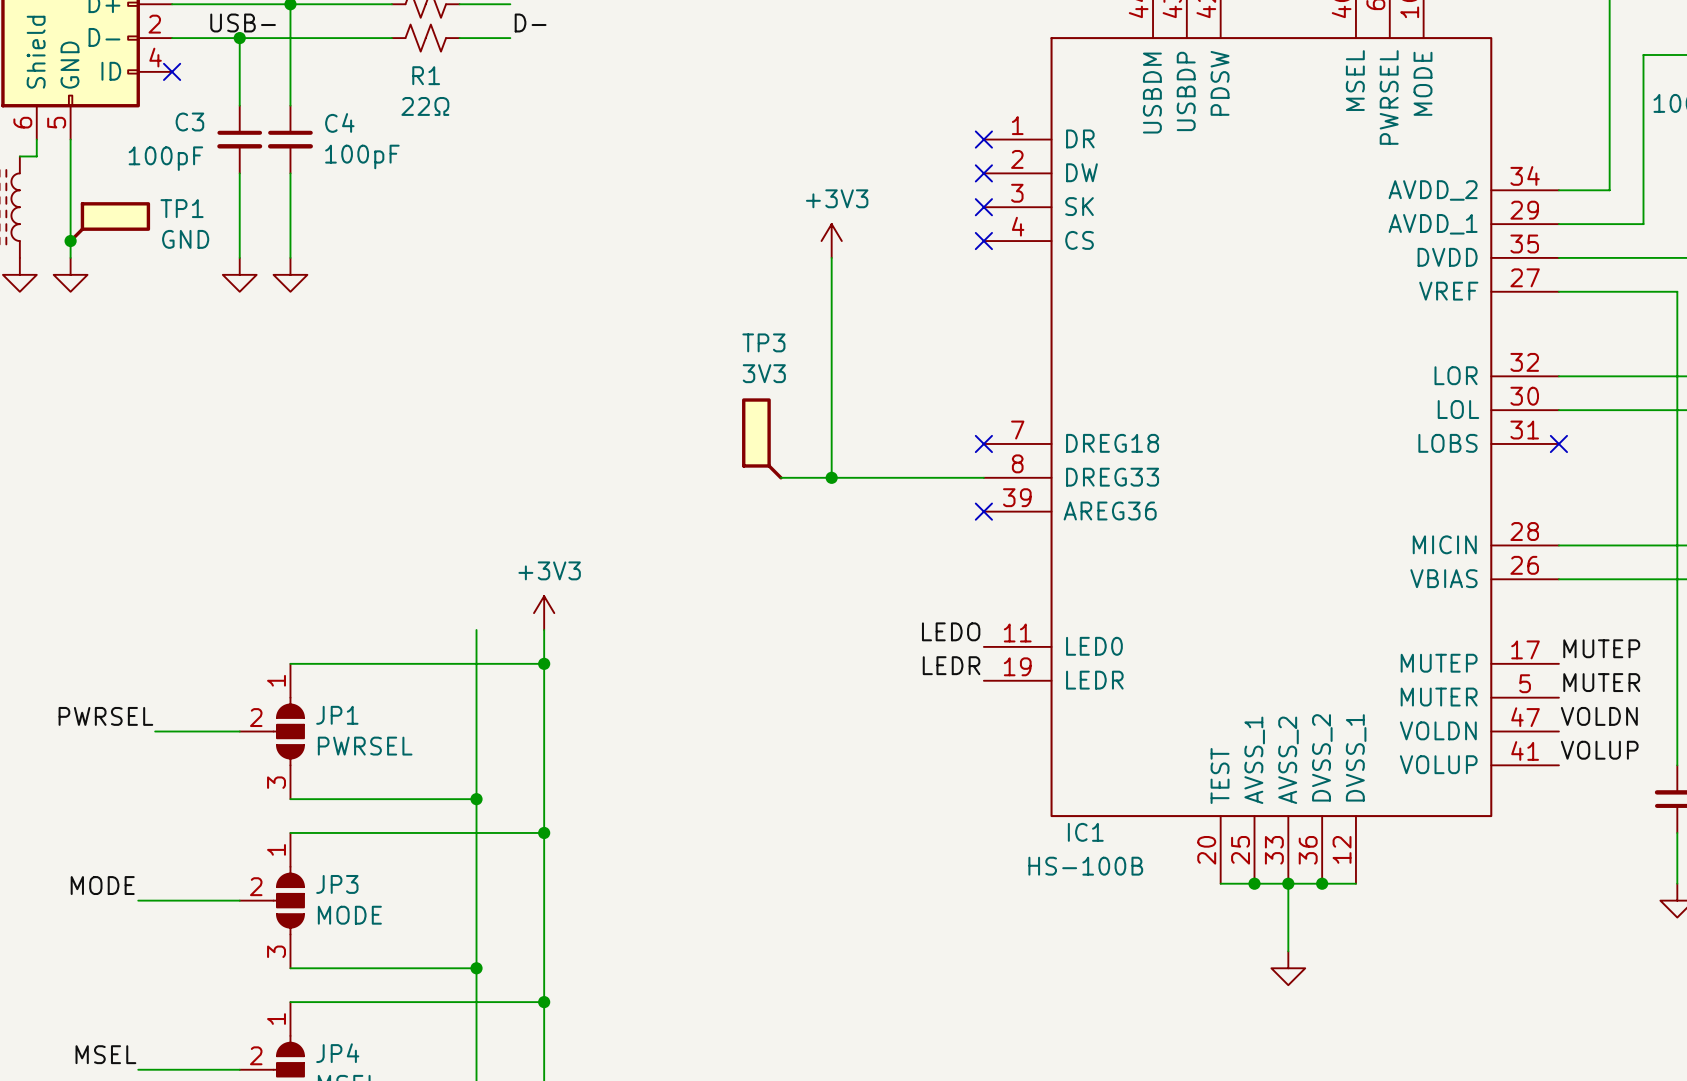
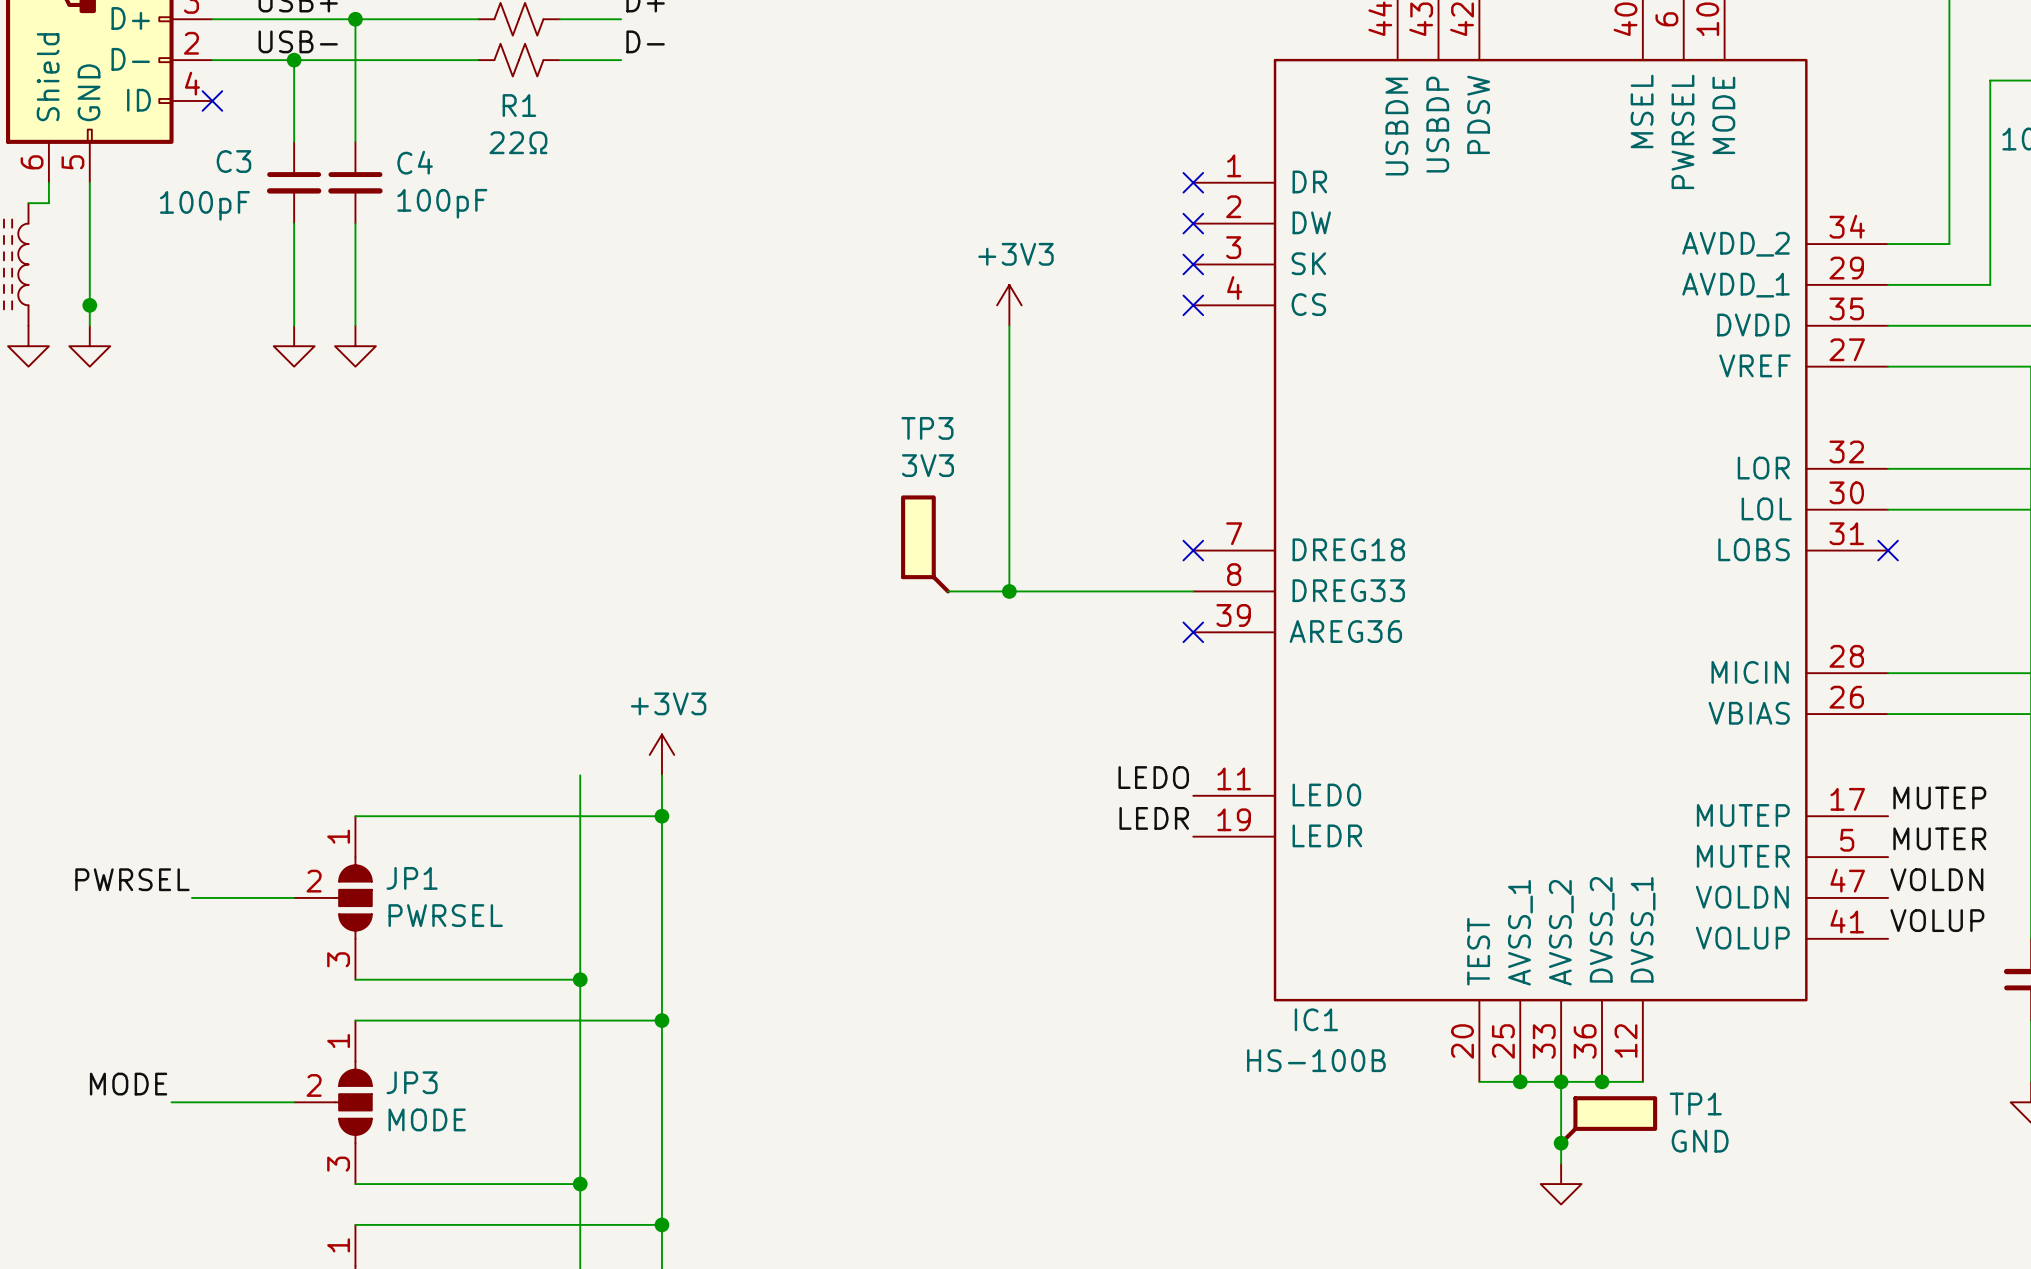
TP1 position: (109, 222) -> (1608, 1120)
junction: none -> (1561, 1143)

